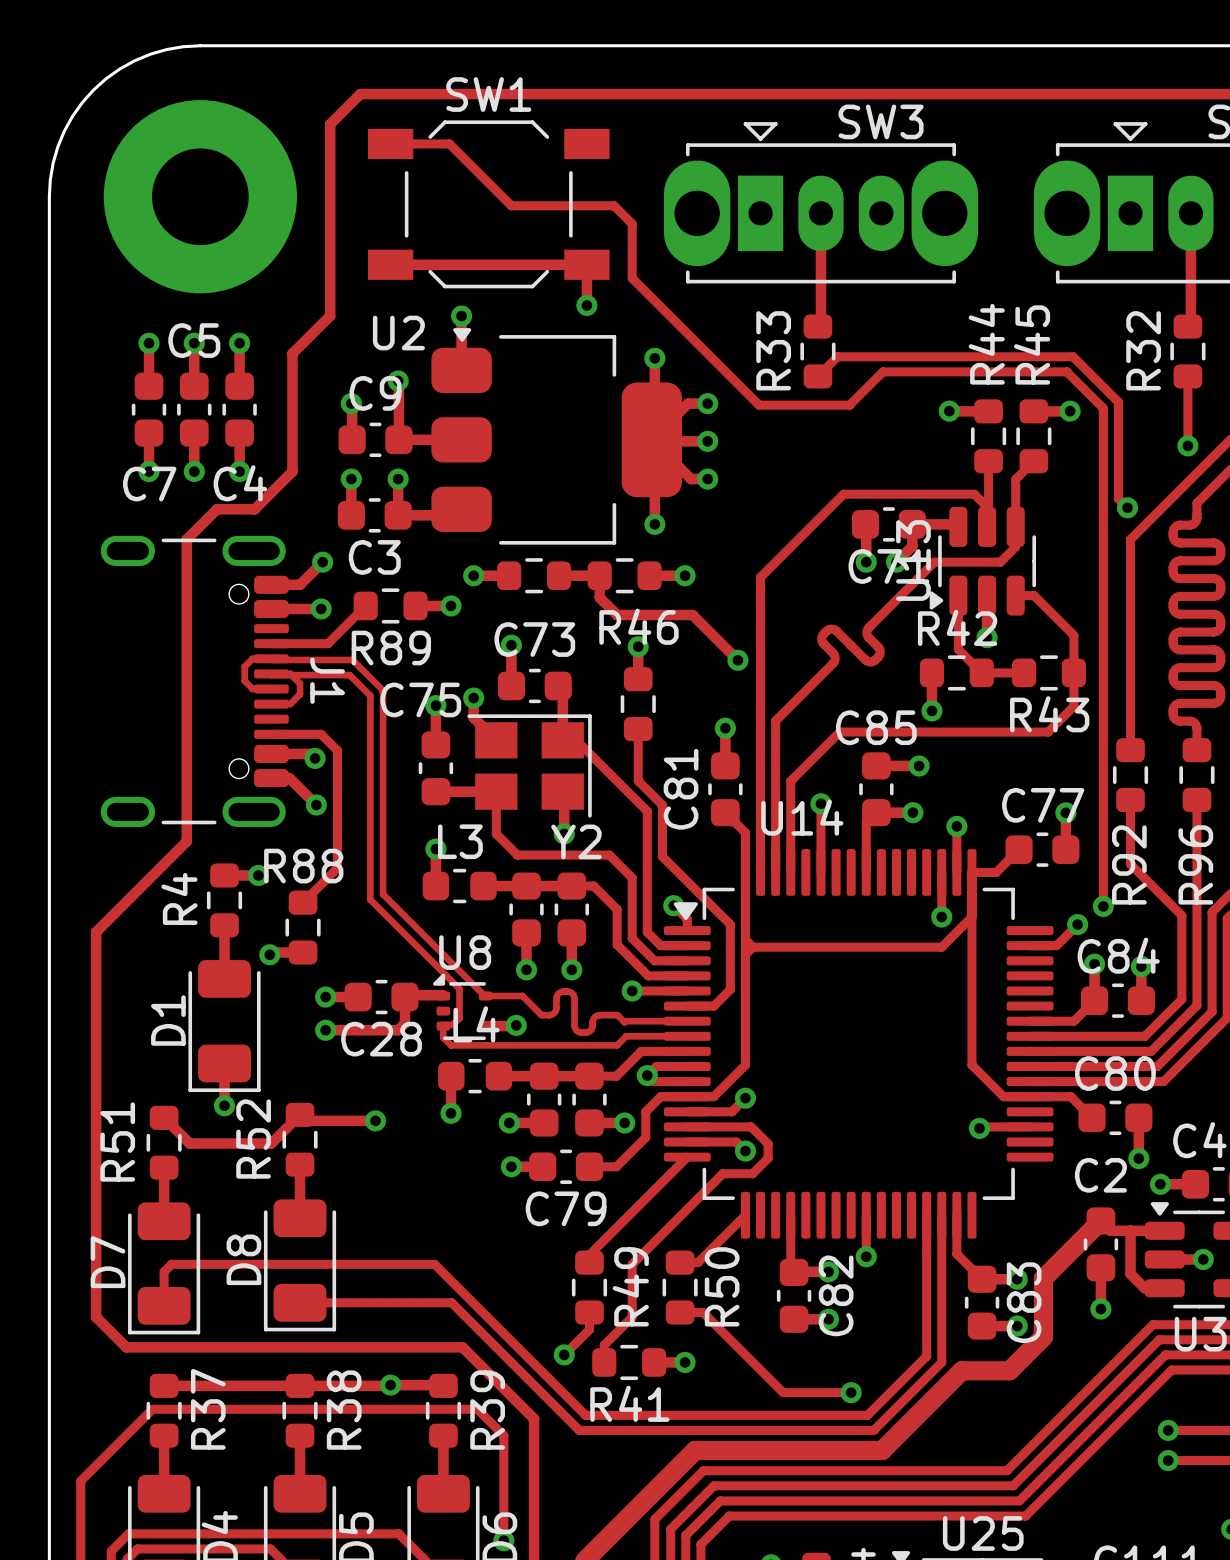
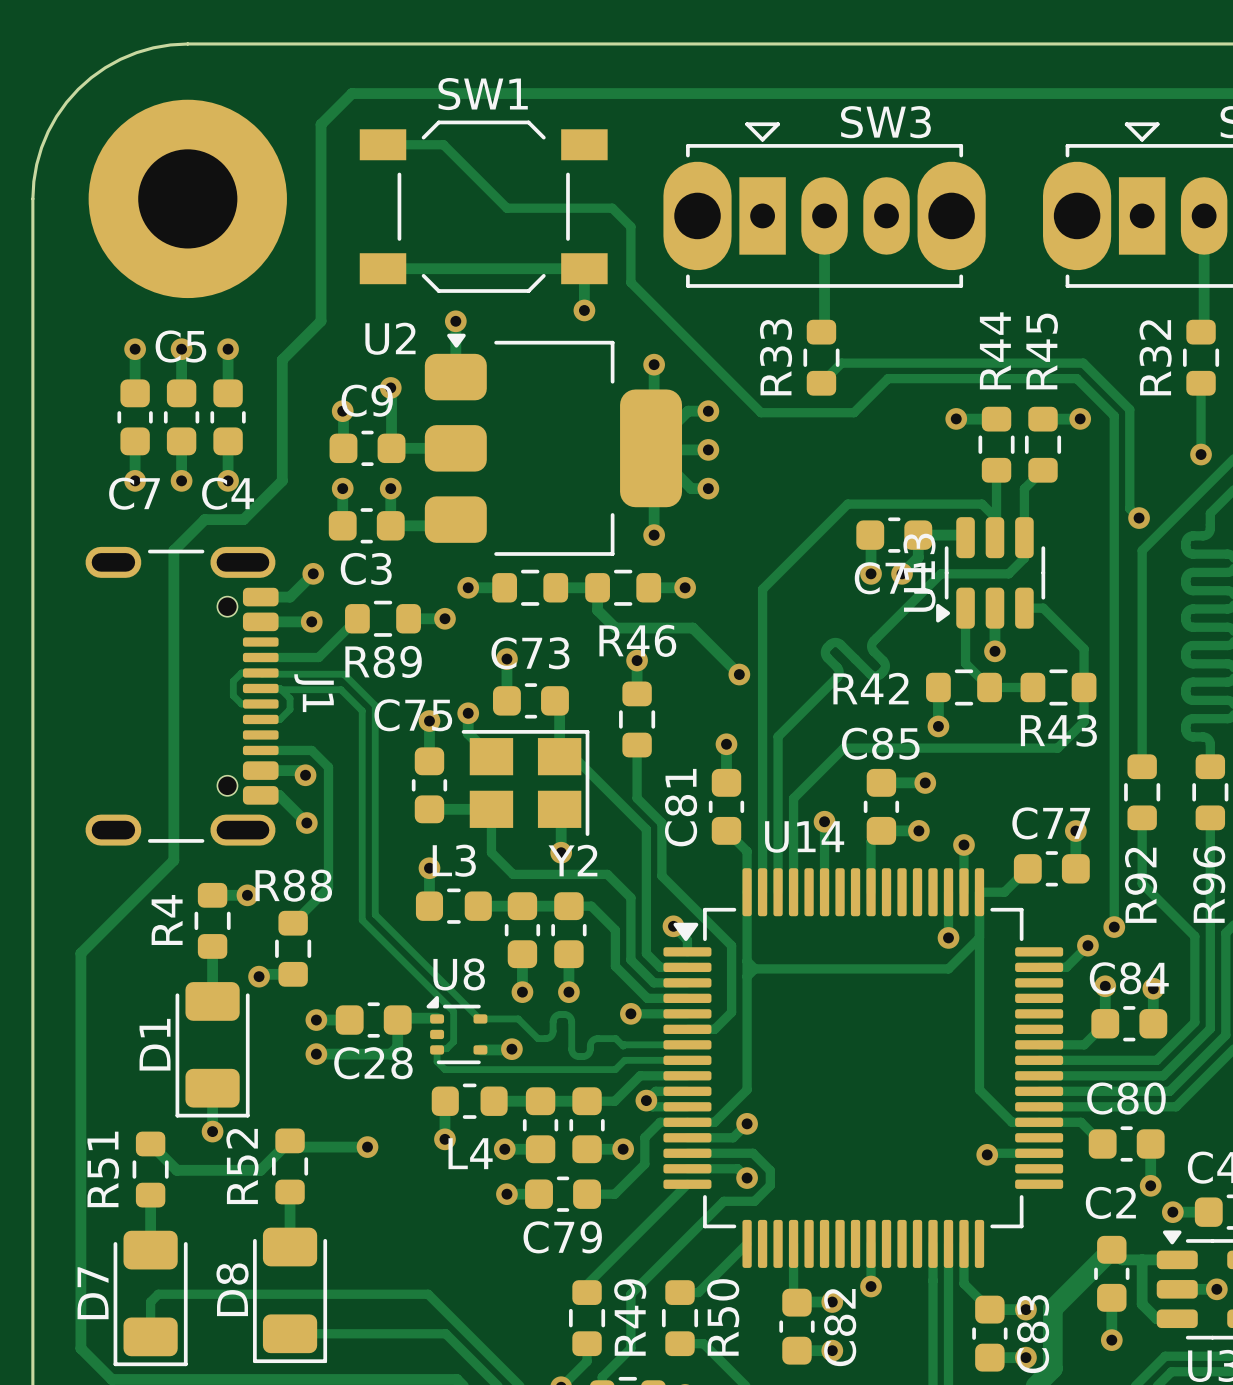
R42 name position: R42 (957, 627) -> R42 (870, 688)
L4 name position: L4 (476, 1024) -> L4 (470, 1153)

